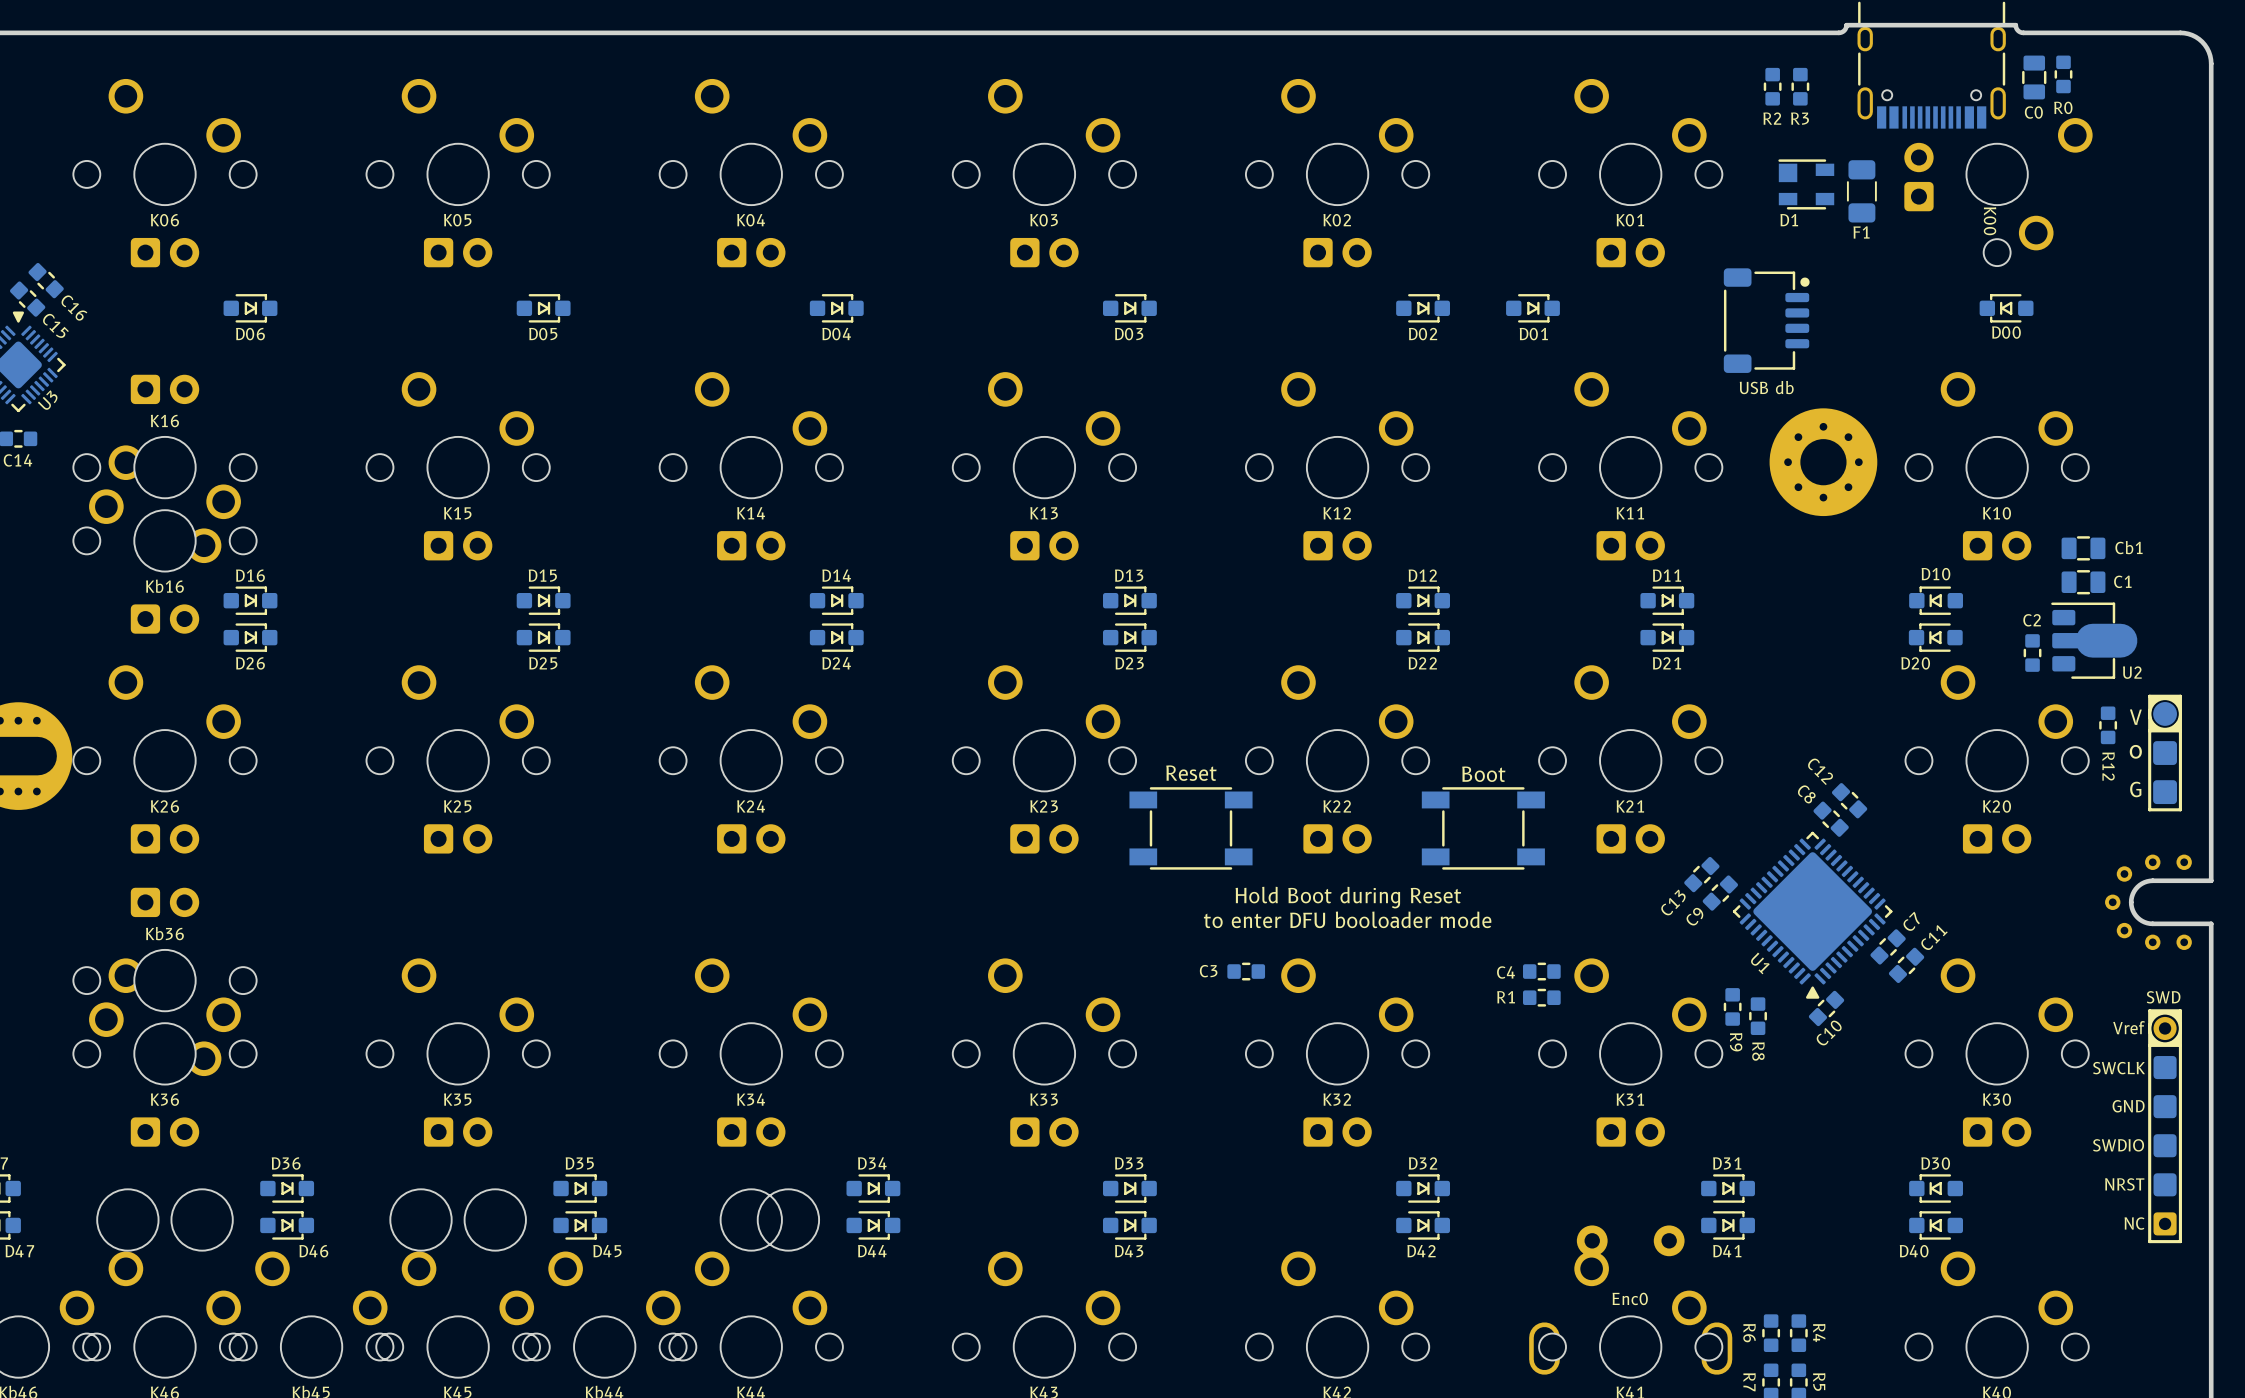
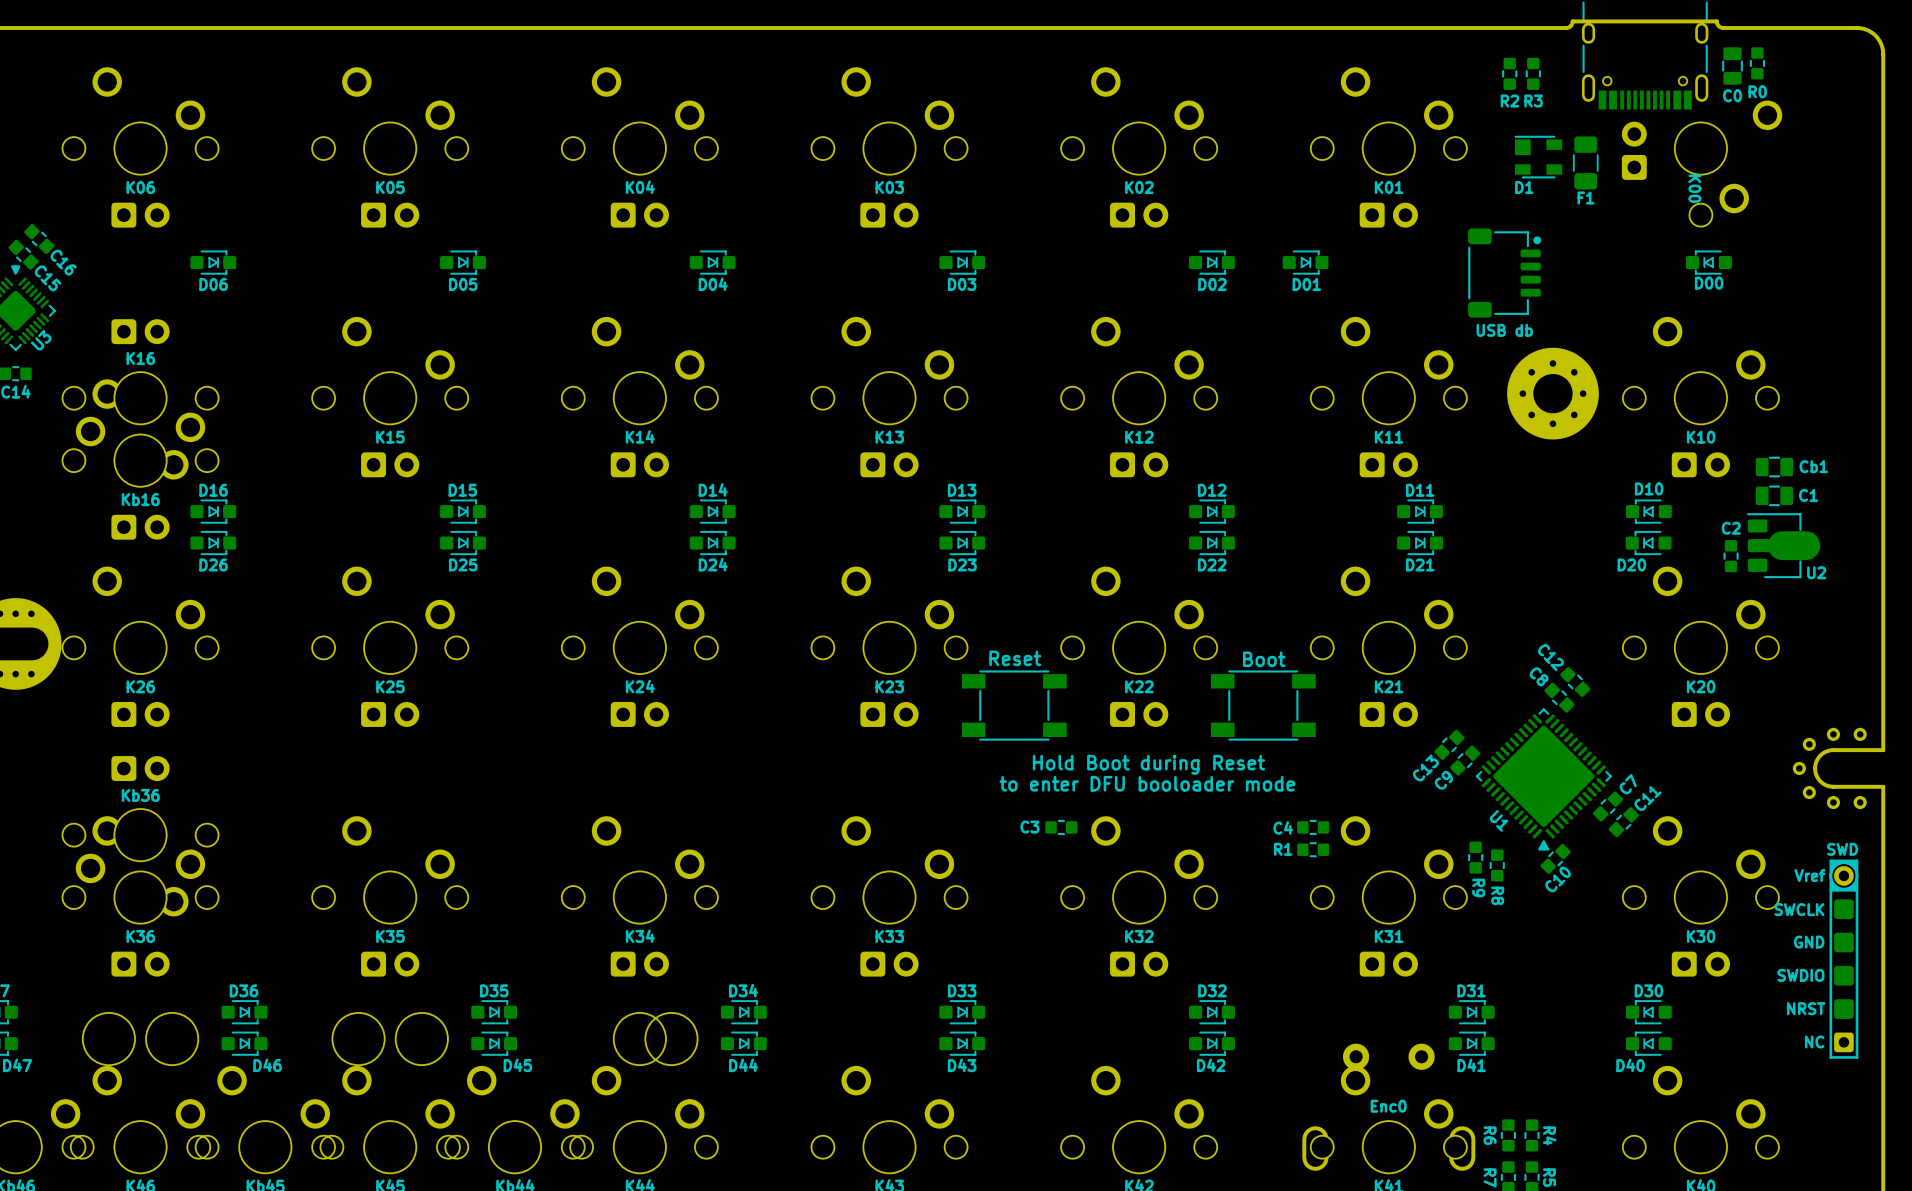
R12: (2108, 725) -> none
part: (2165, 753) -> none

